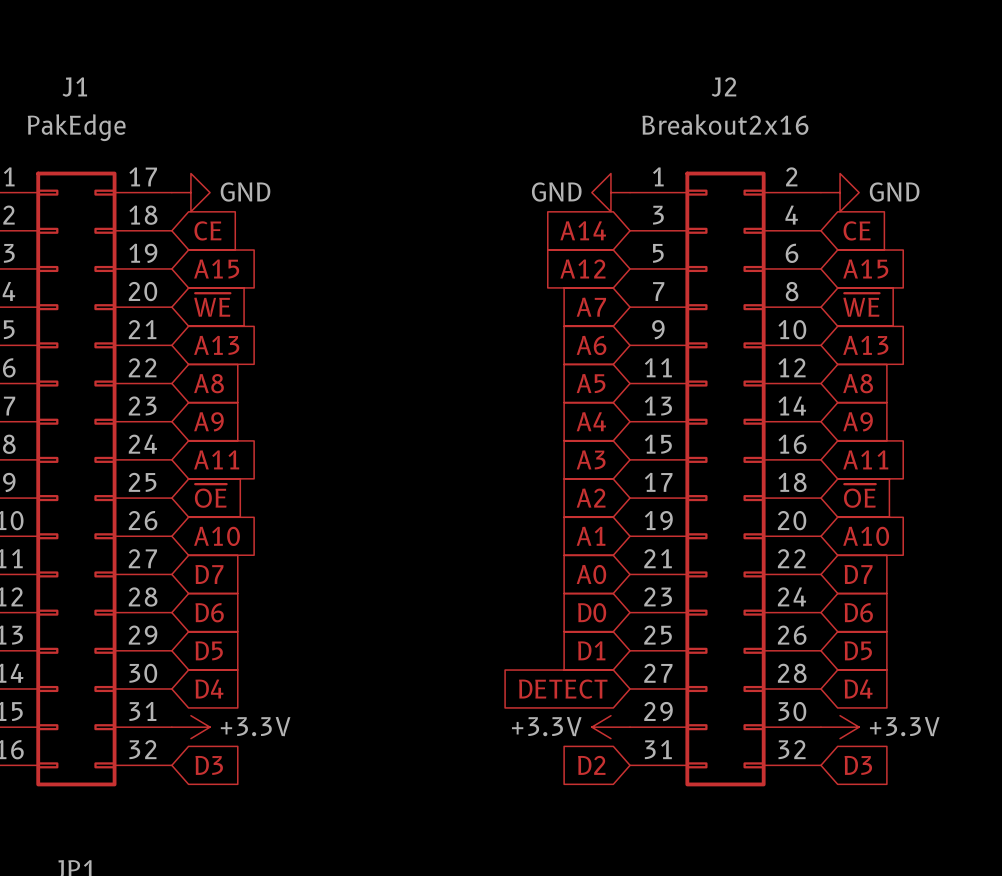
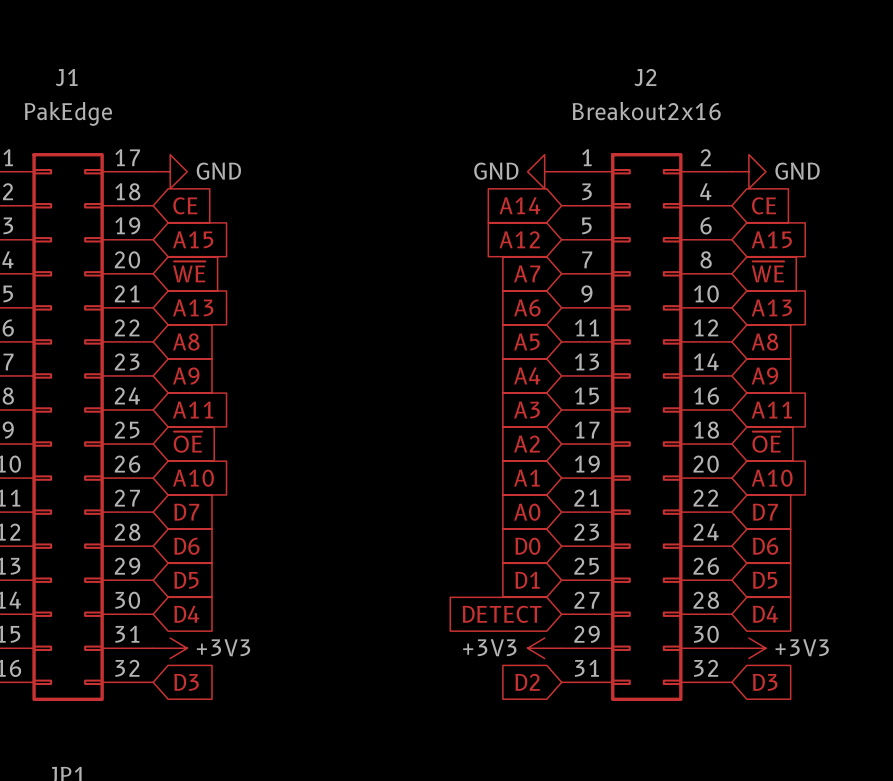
power symbol: +3.3V (190, 727) -> +3V3 (170, 648)
power symbol: +3.3V (610, 727) -> +3V3 (544, 648)
power symbol: +3.3V (840, 727) -> +3V3 (748, 648)

